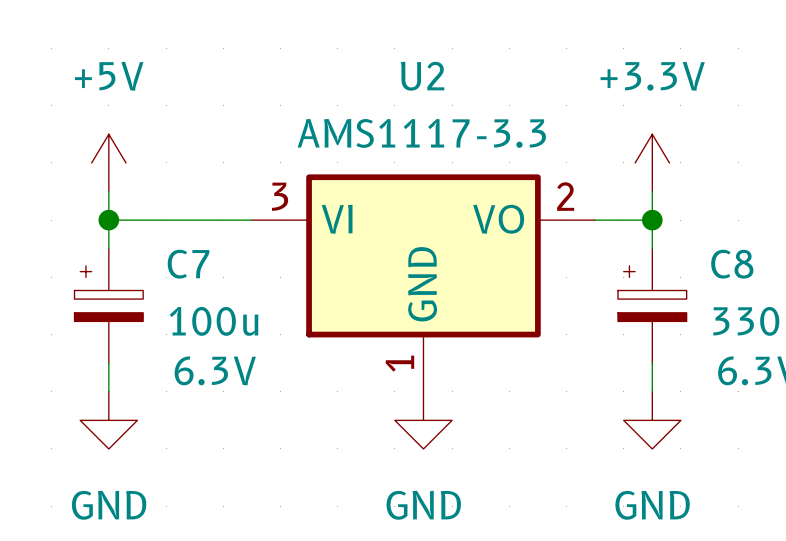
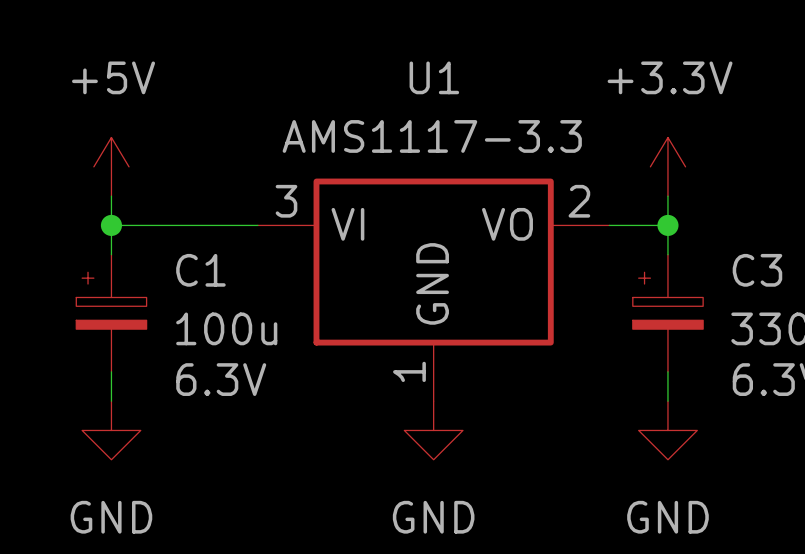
U2 name: U2 (422, 76) -> U1 (434, 77)
C7 name: C7 (188, 264) -> C1 (200, 270)
C8 name: C8 (732, 264) -> C3 (757, 270)

